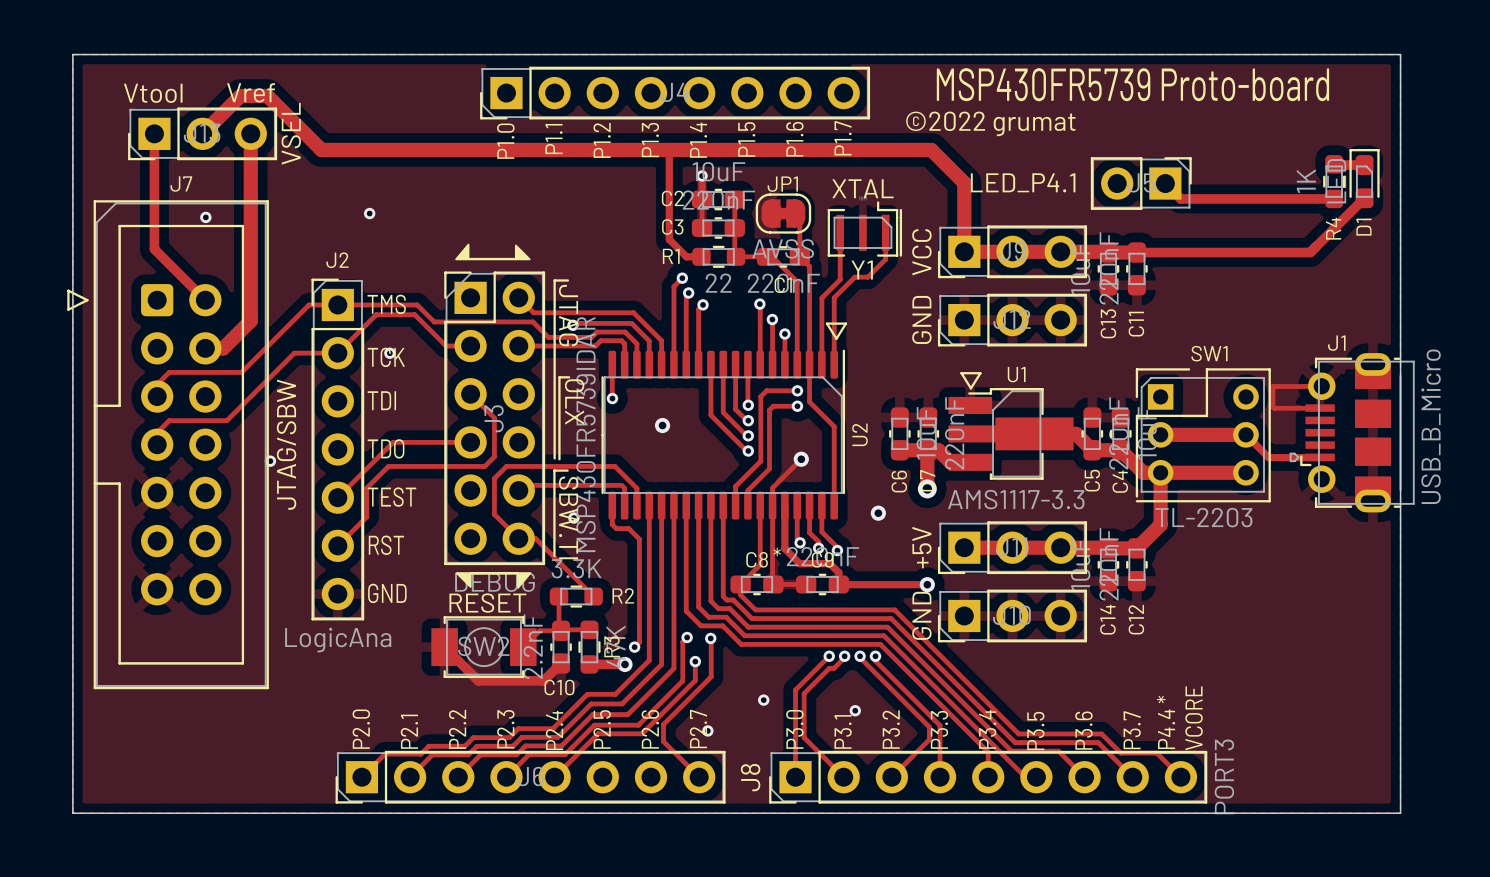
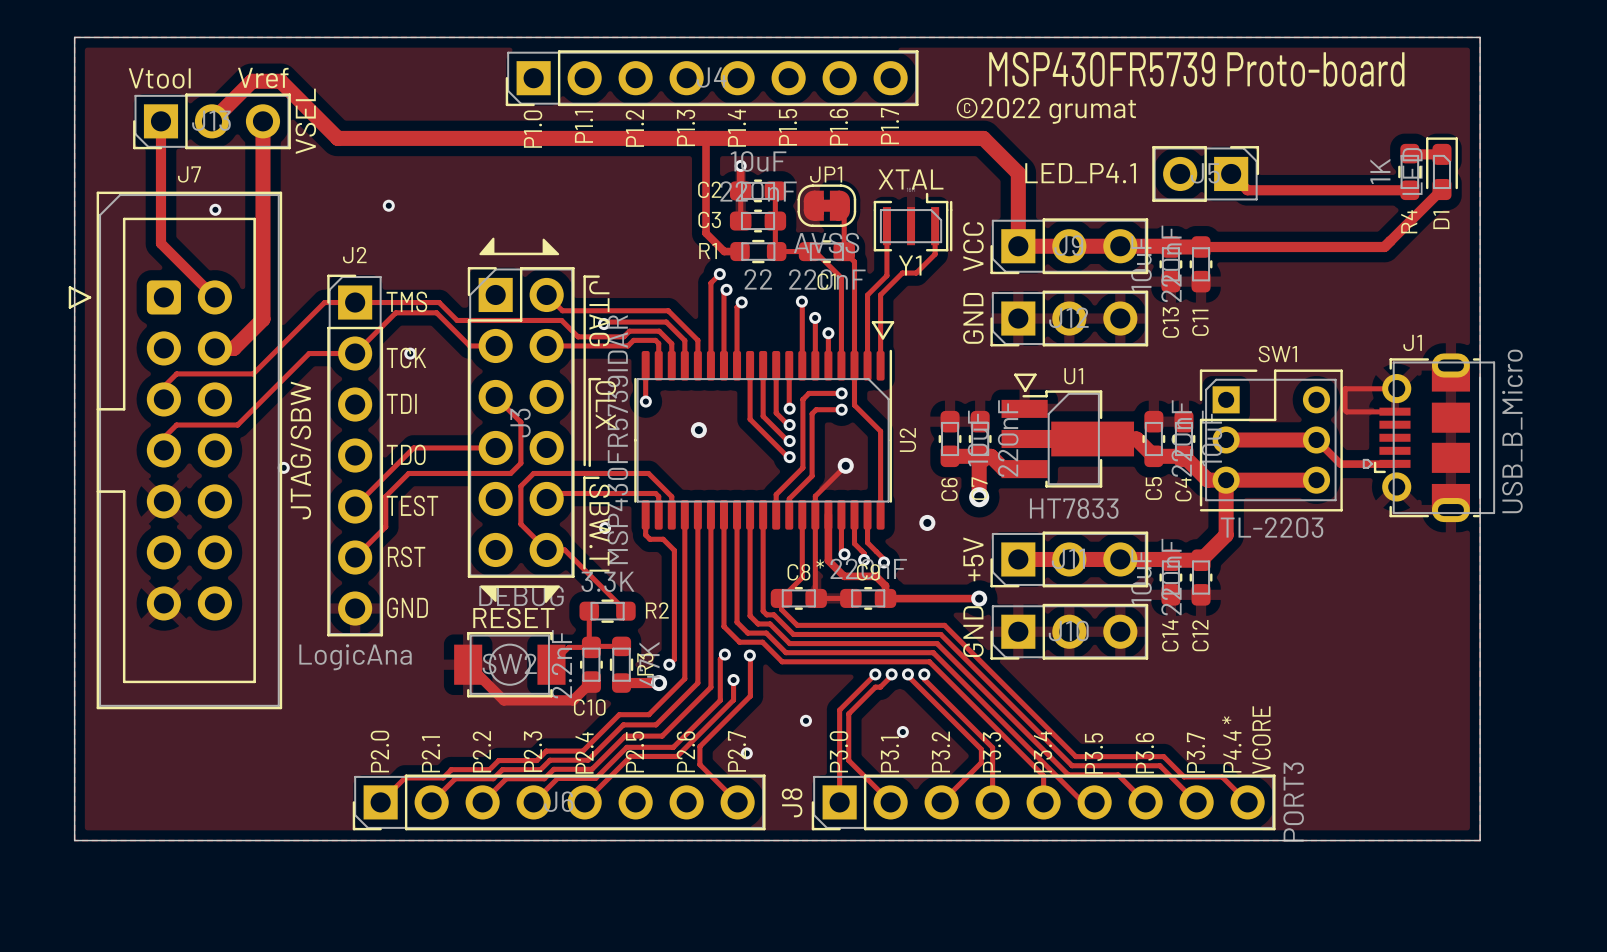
U1 value: AMS1117-3.3 (1016, 499) -> HT7833 (1074, 508)

